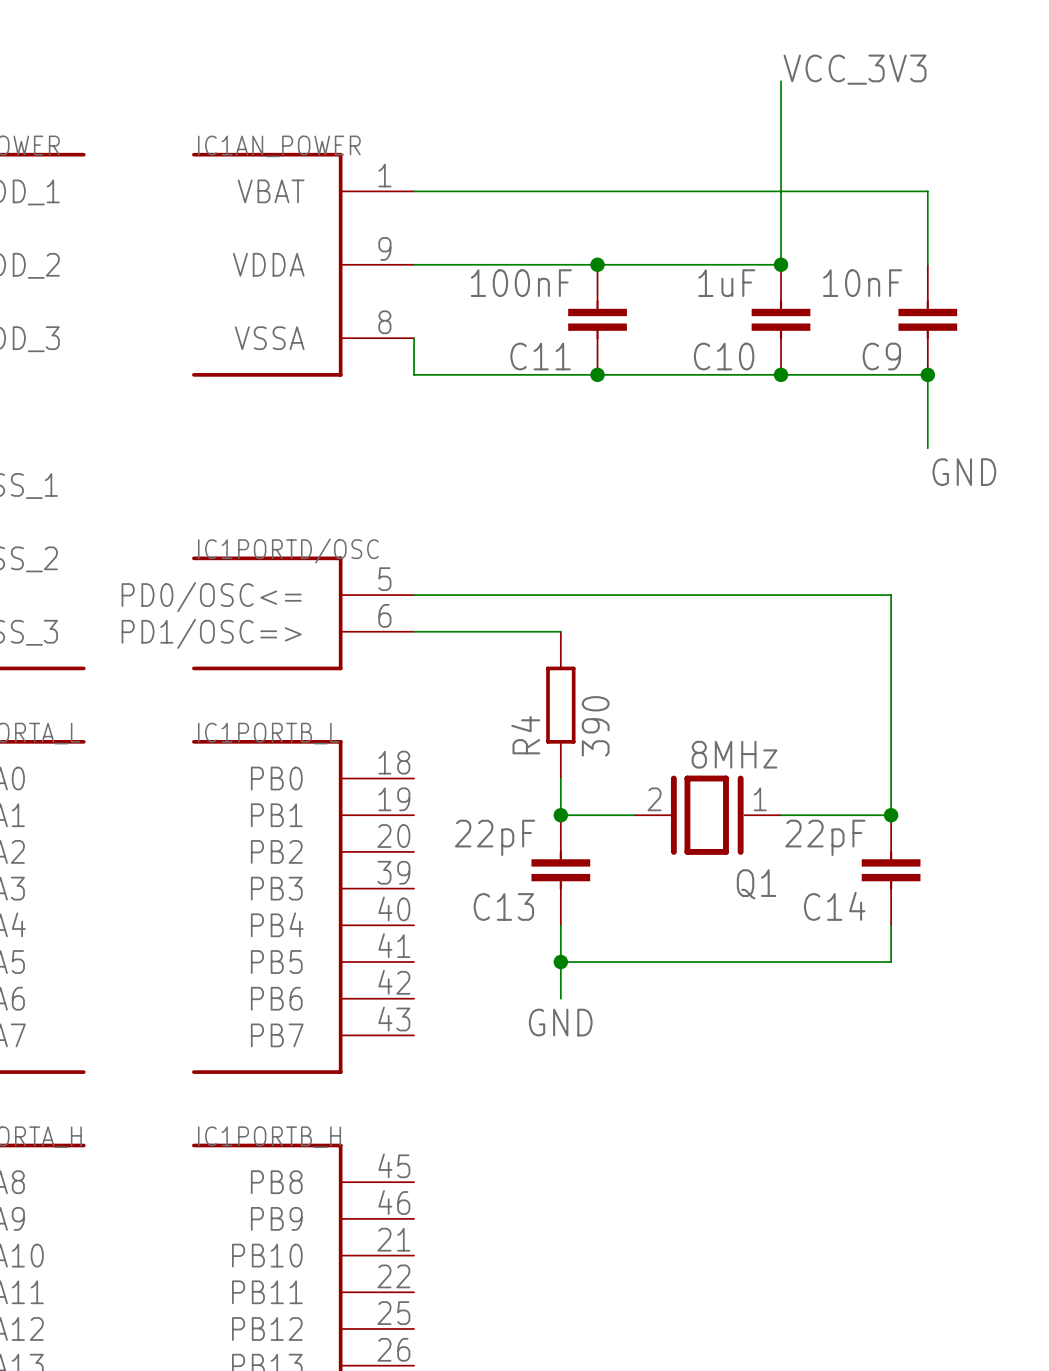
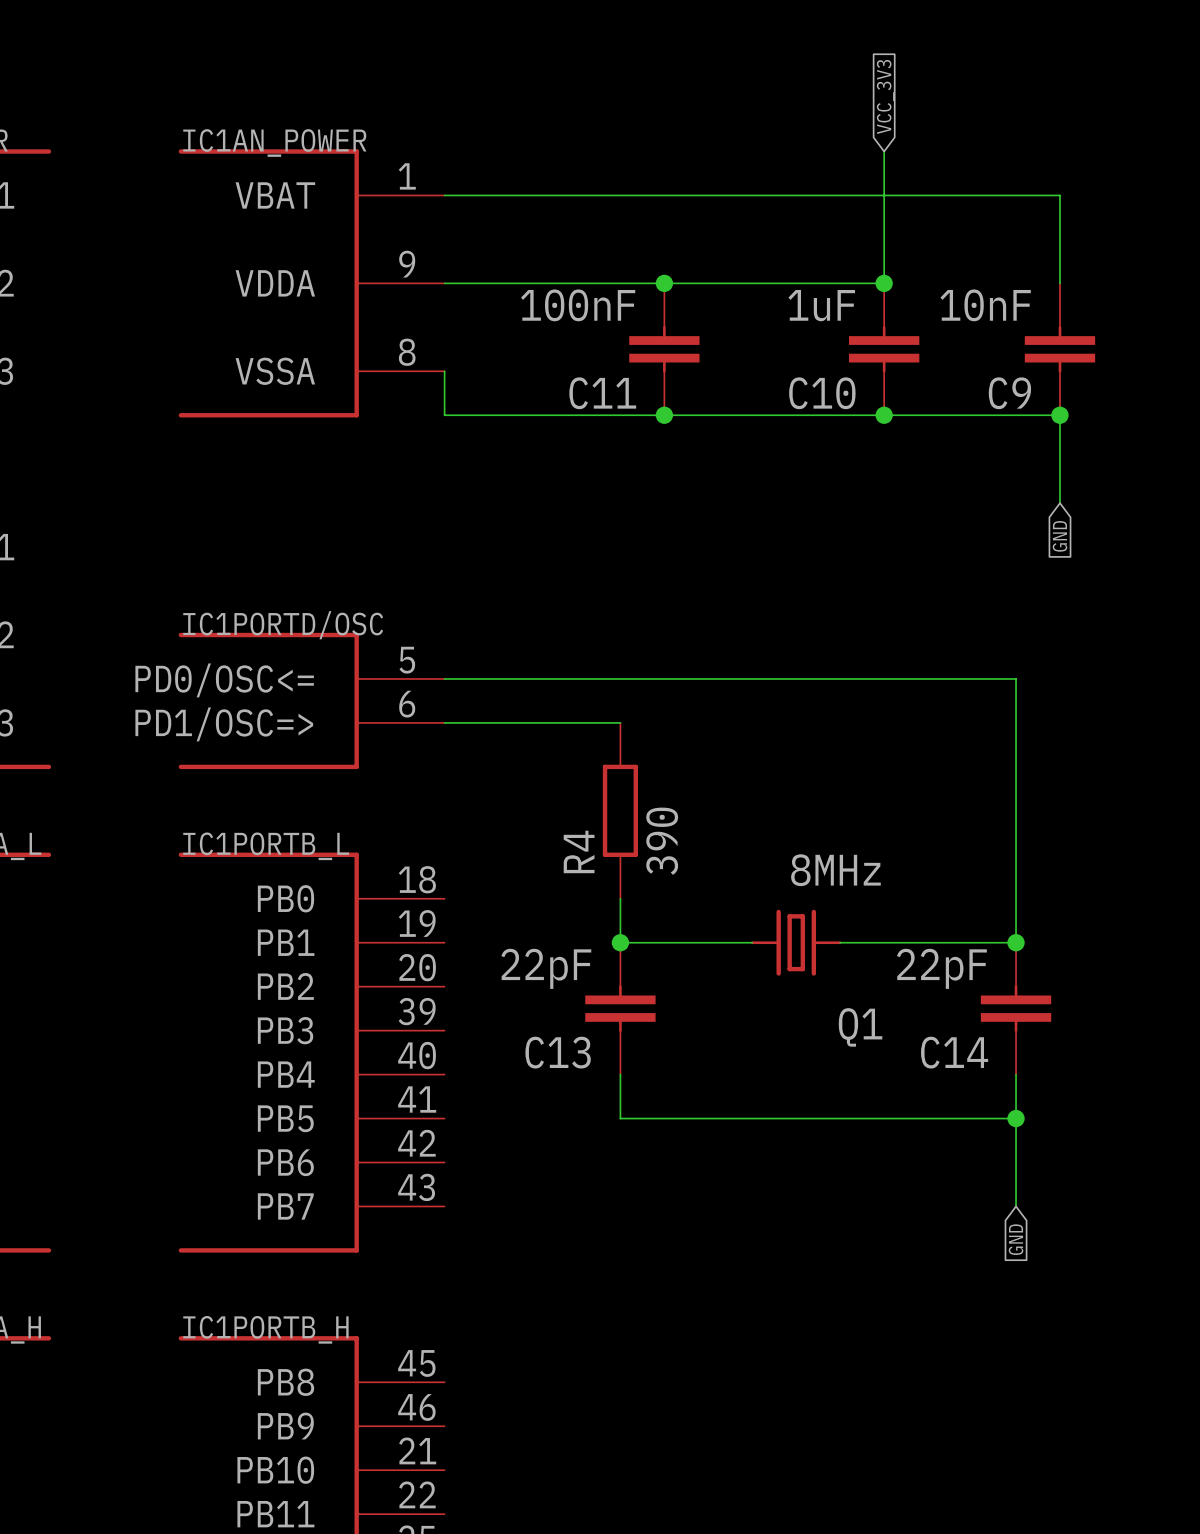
label: VCC_3V3 (855, 69) -> none
wire: (781, 81) (781, 154) -> none
global label: none -> VCC_3V3 (885, 96)
label: GND (964, 472) -> none
global label: none -> GND (1059, 536)
Q1 symbol: [634, 775, 782, 855] -> [750, 909, 842, 976]
wire: (560, 962) (560, 998) -> none
junction: (560, 962) -> none
wire: none -> (1016, 1118) (1016, 1206)
junction: none -> (1016, 1118)
label: GND (560, 1022) -> none
global label: none -> GND (1016, 1239)

